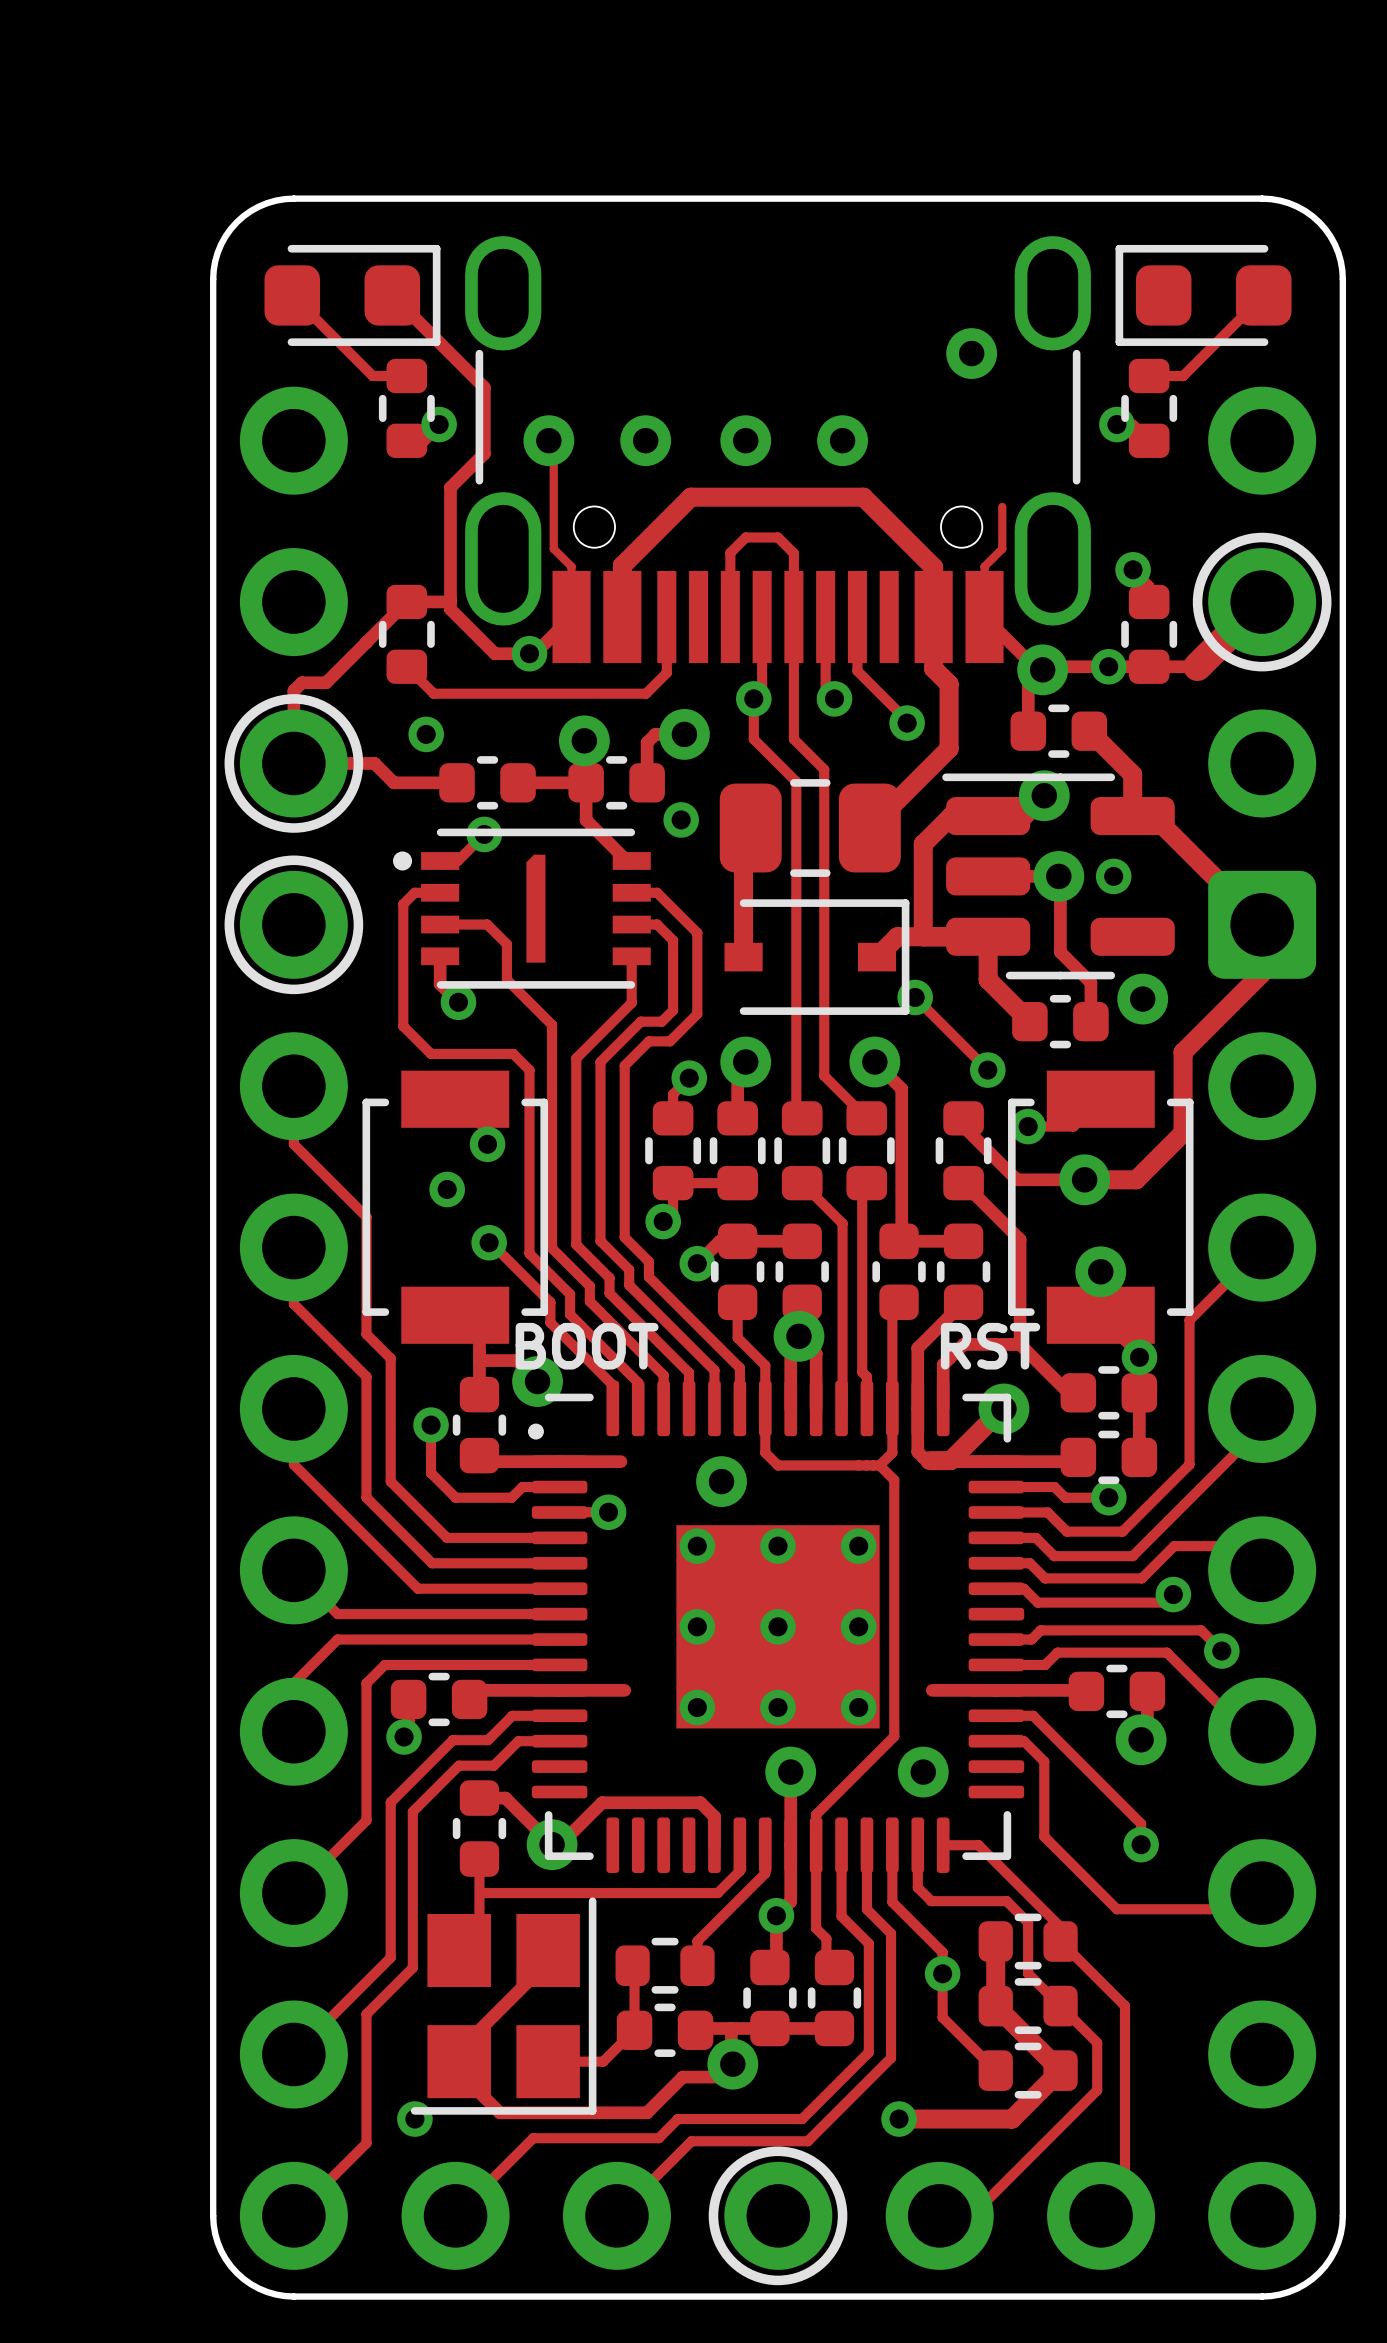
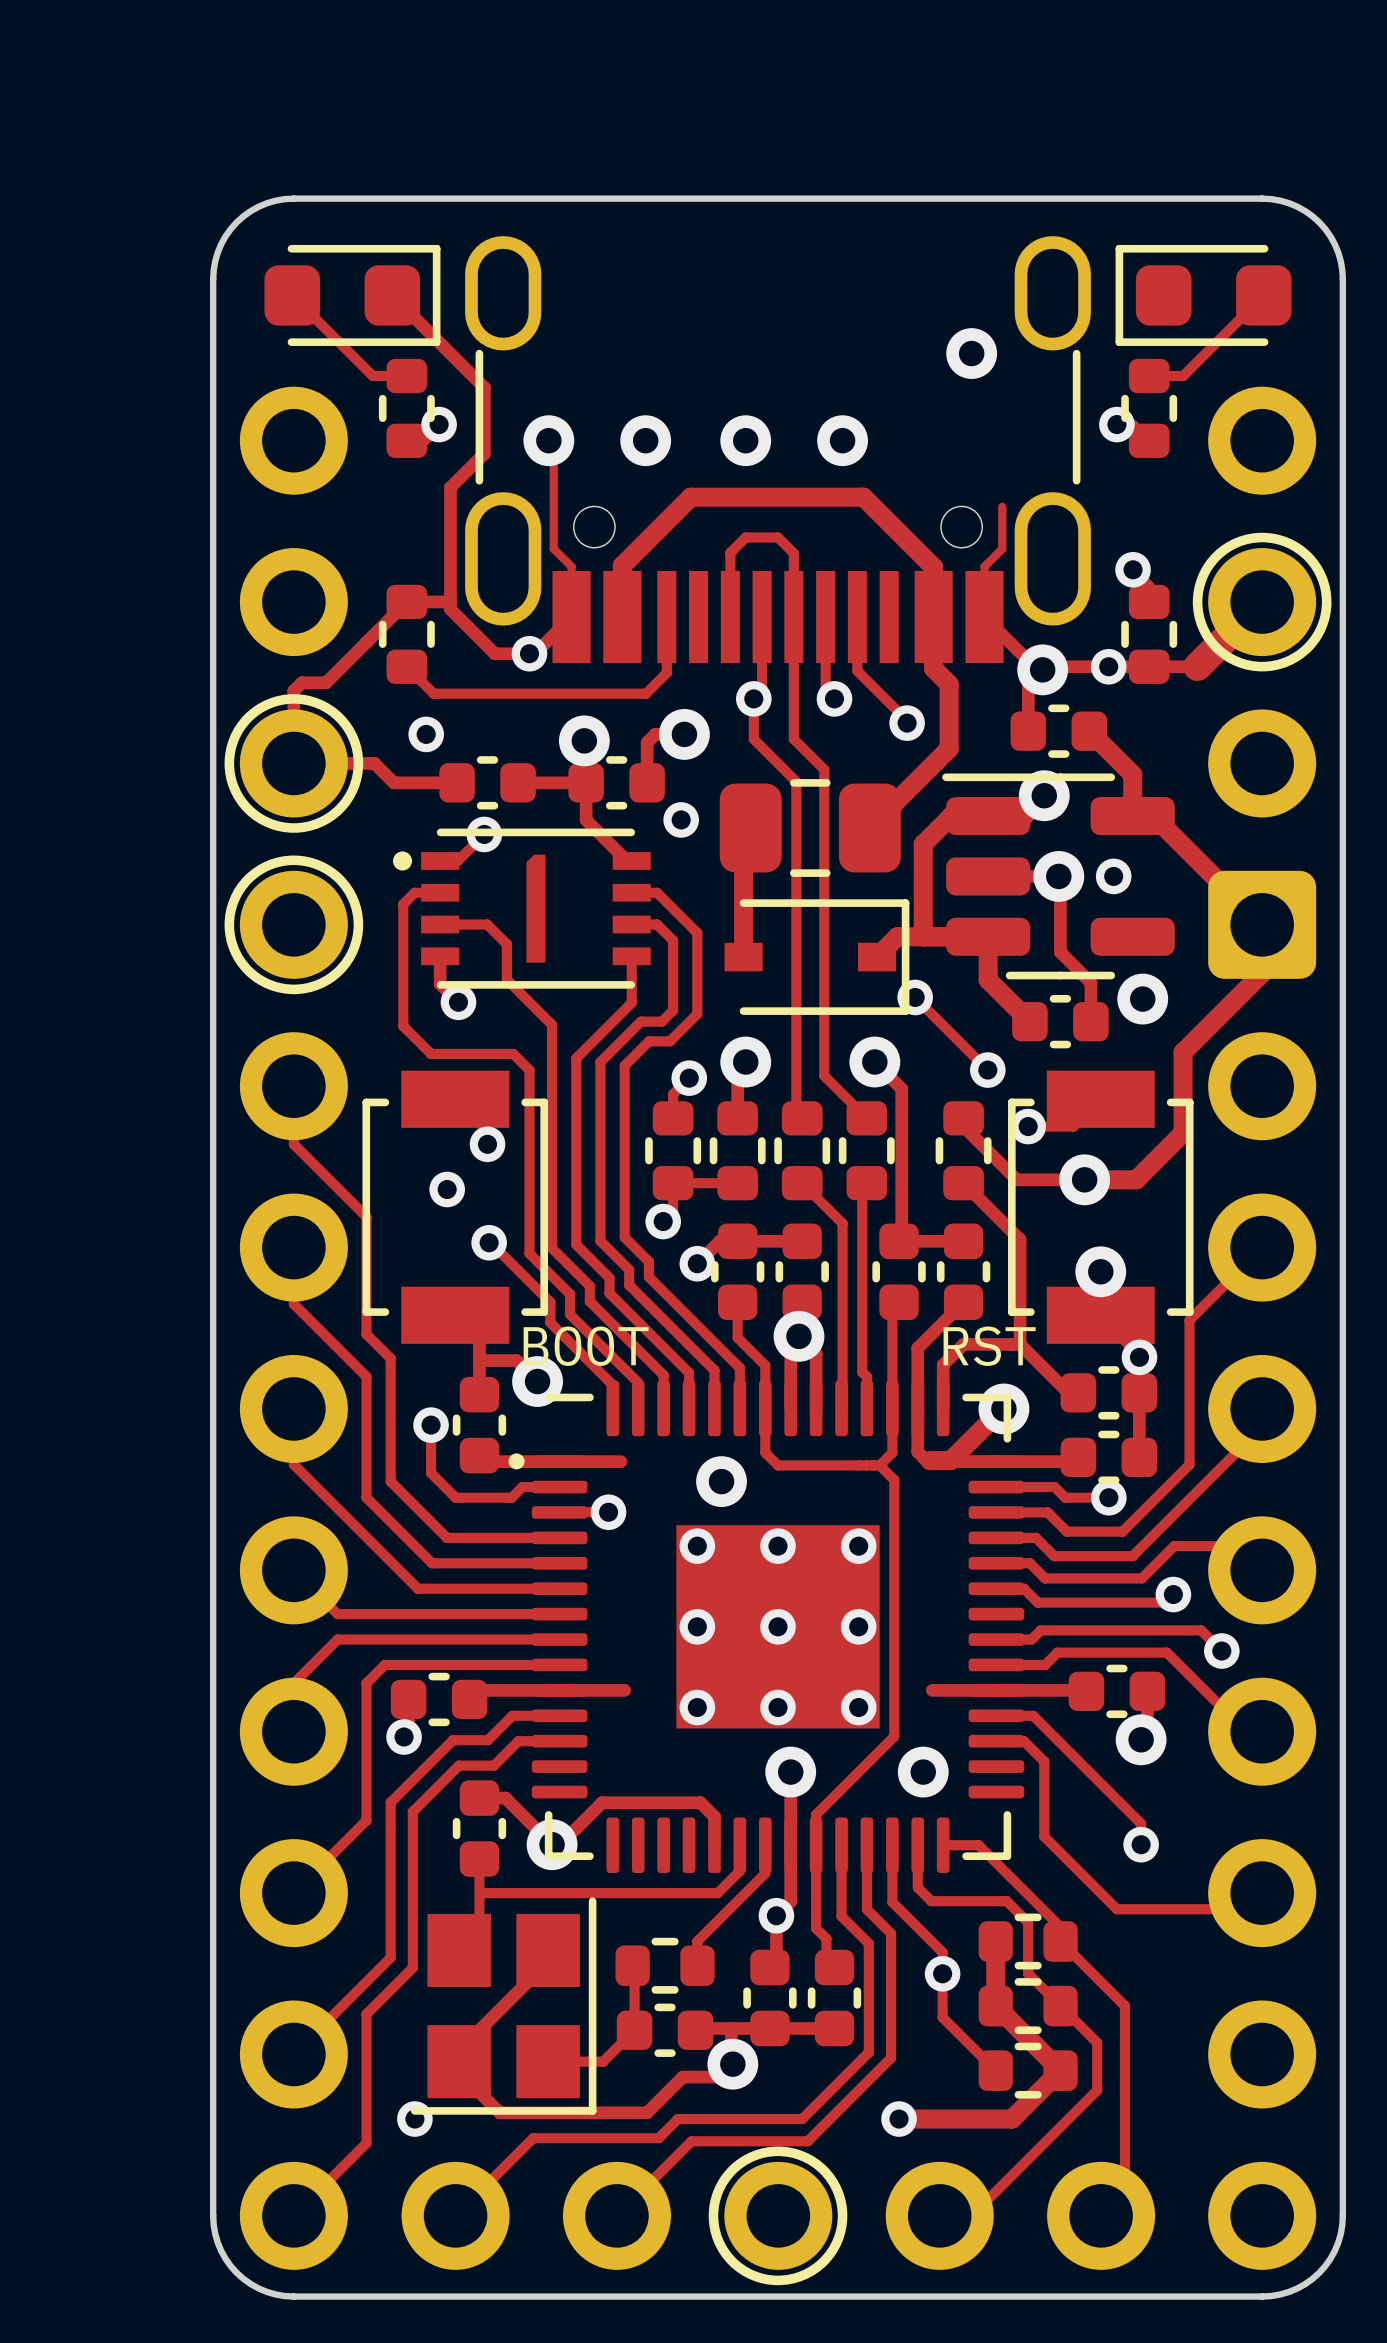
drawing position: (535, 1431) -> (516, 1461)

